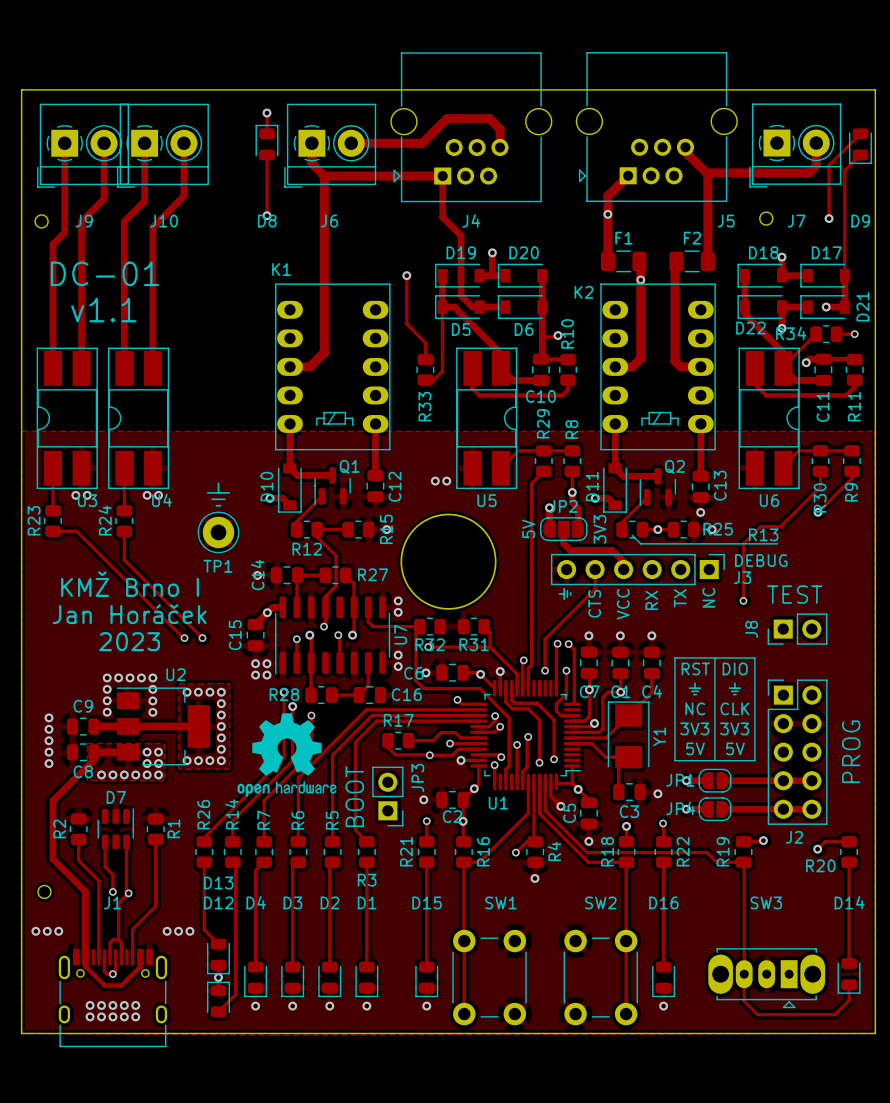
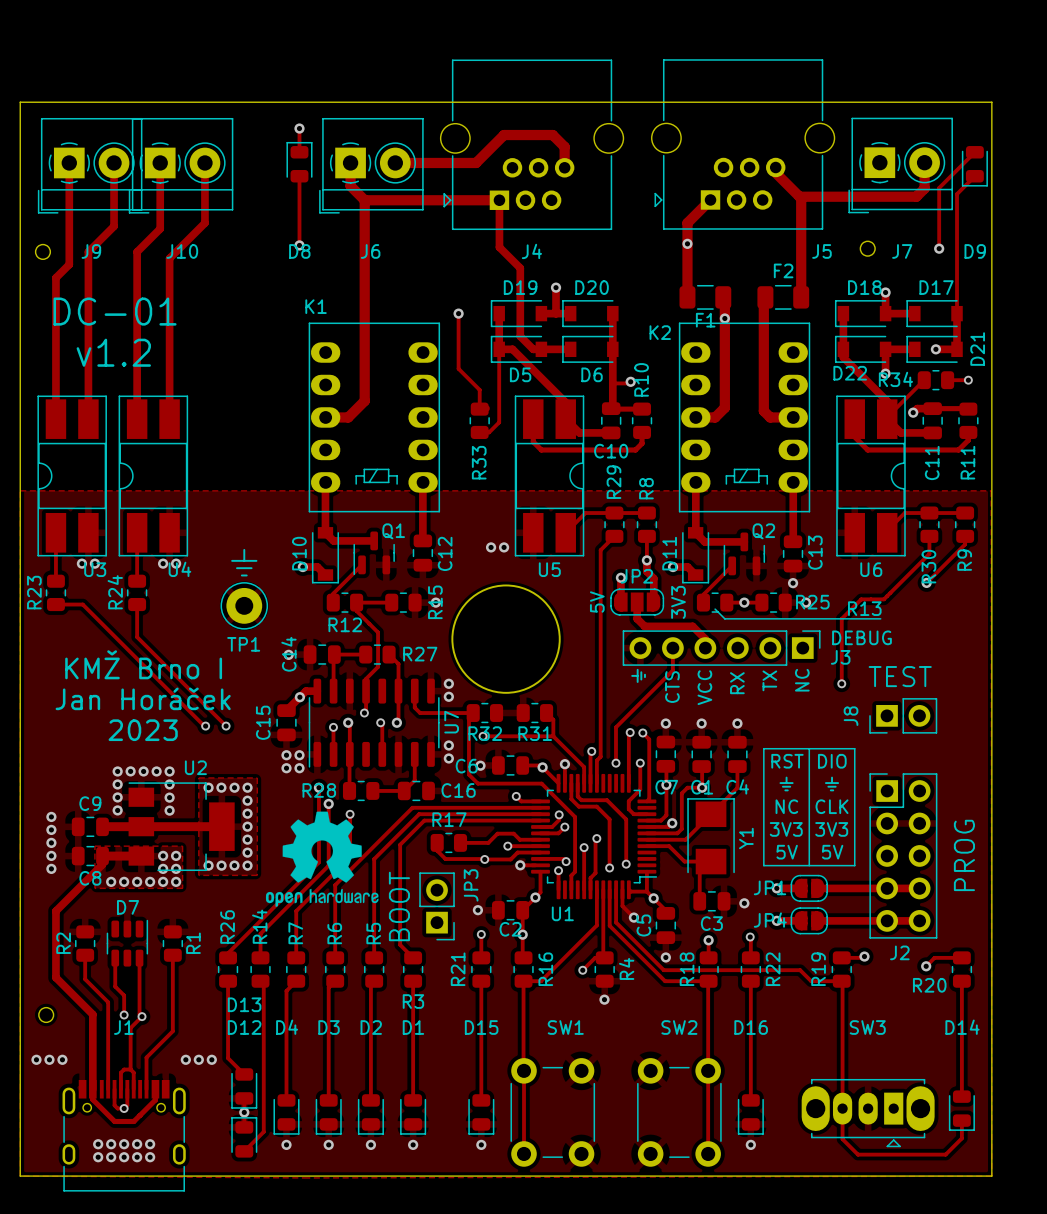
F1 name position: F1 (623, 238) -> F1 (705, 320)
text: v1.1 (103, 310) -> v1.2 (113, 352)

